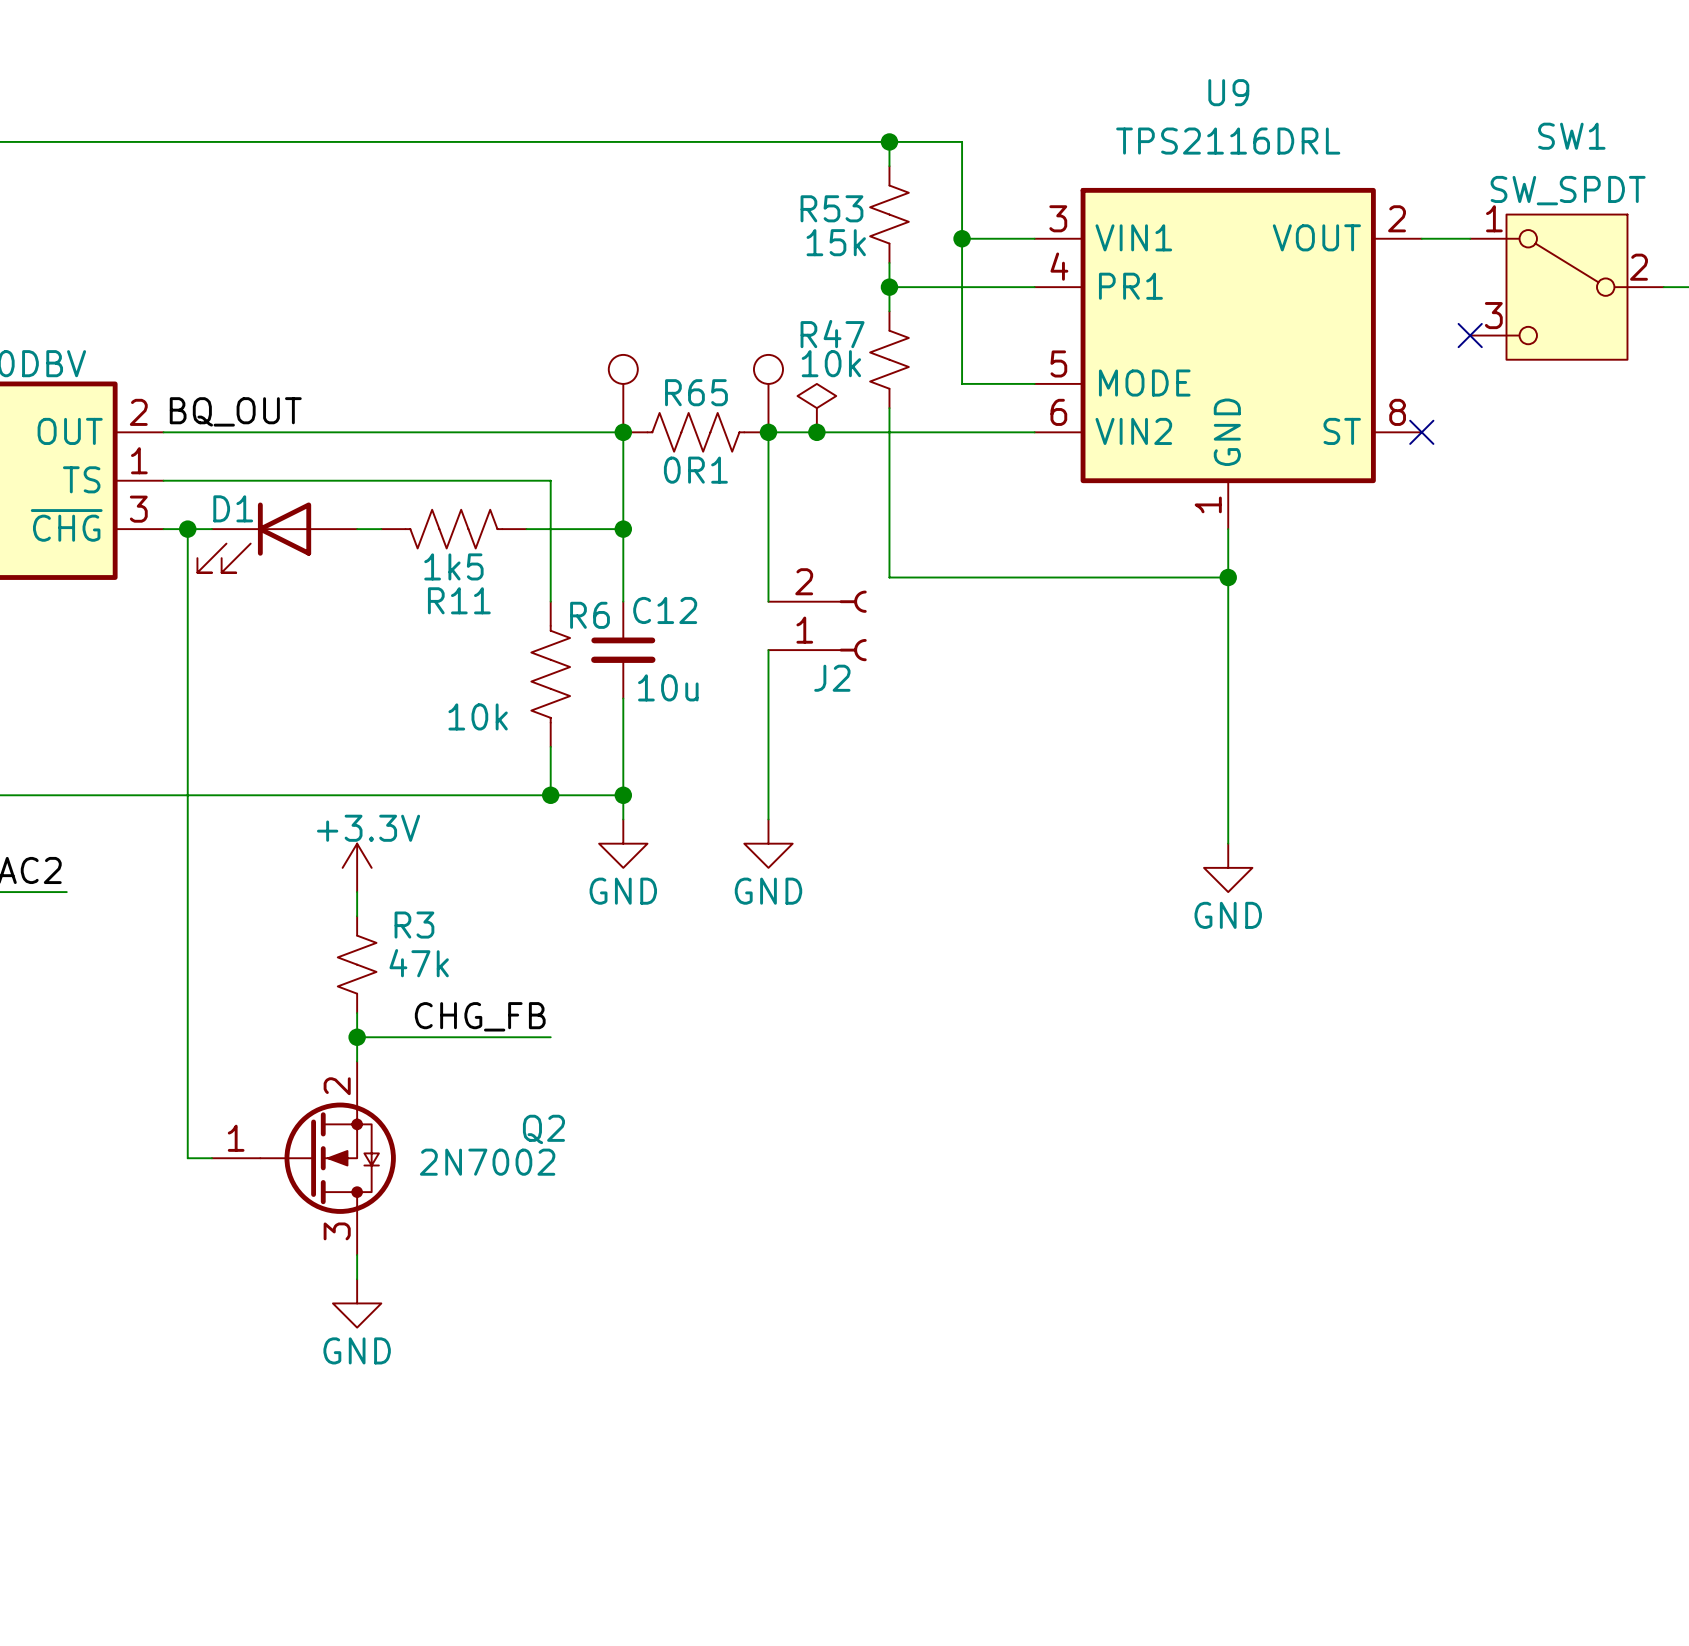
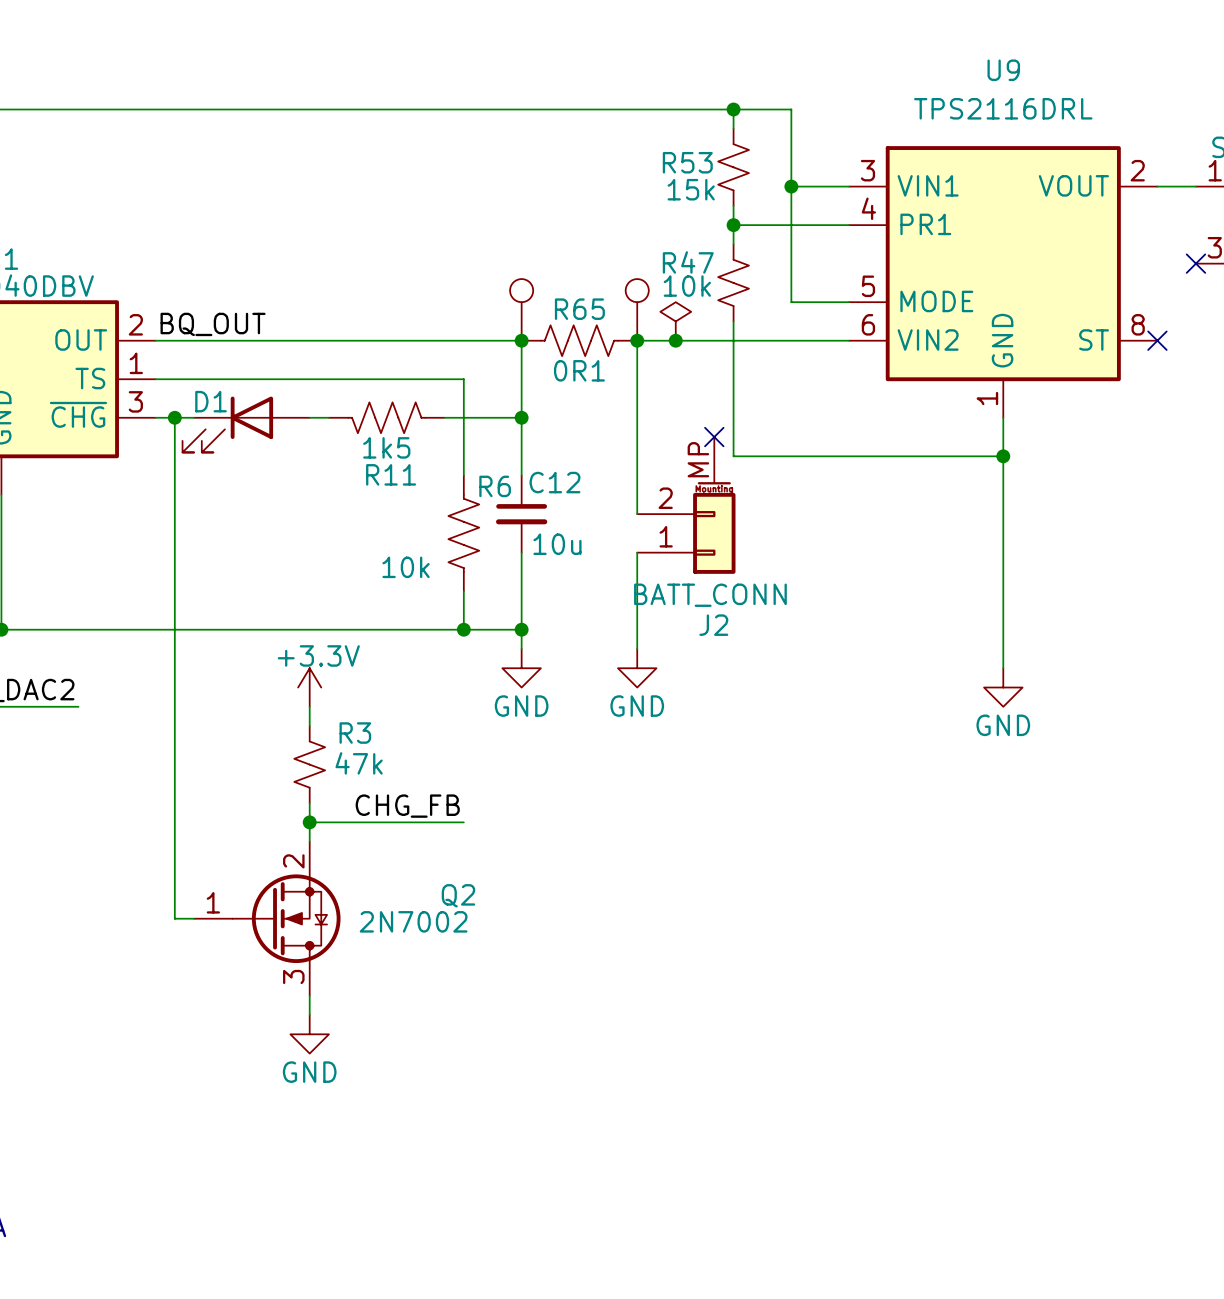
no-connect mark: none -> (714, 437)
J2 symbol: [768, 590, 867, 662] -> [637, 437, 736, 574]
wire: (768, 650) (768, 698) -> (637, 514) (637, 475)
J2 name position: J2 (832, 678) -> J2 (713, 625)
J2 value: none -> BATT_CONN (710, 595)

